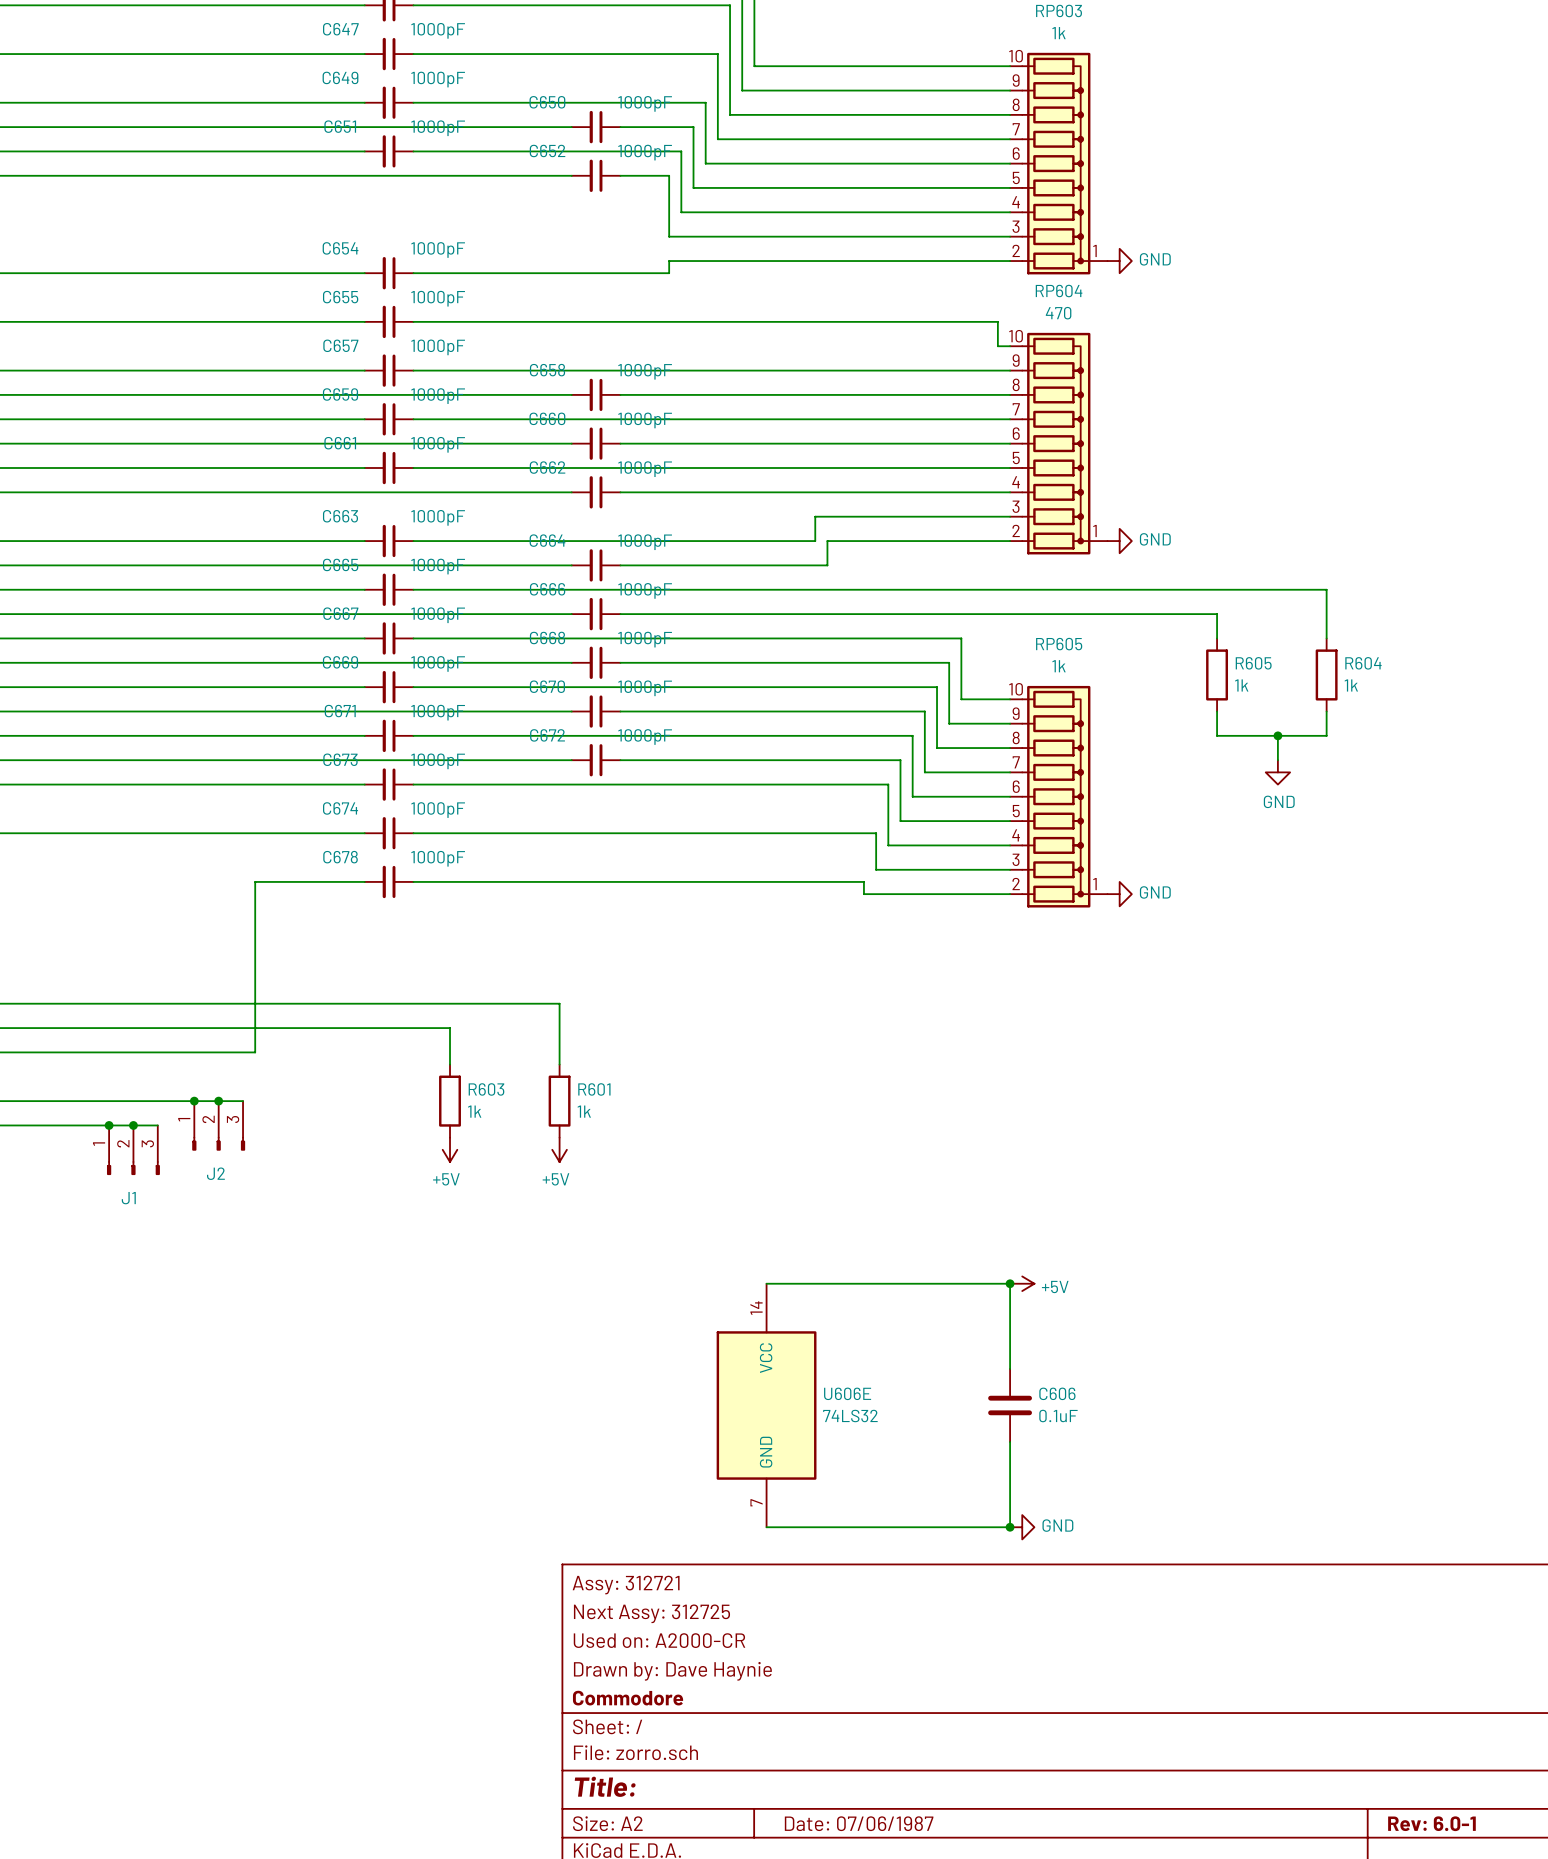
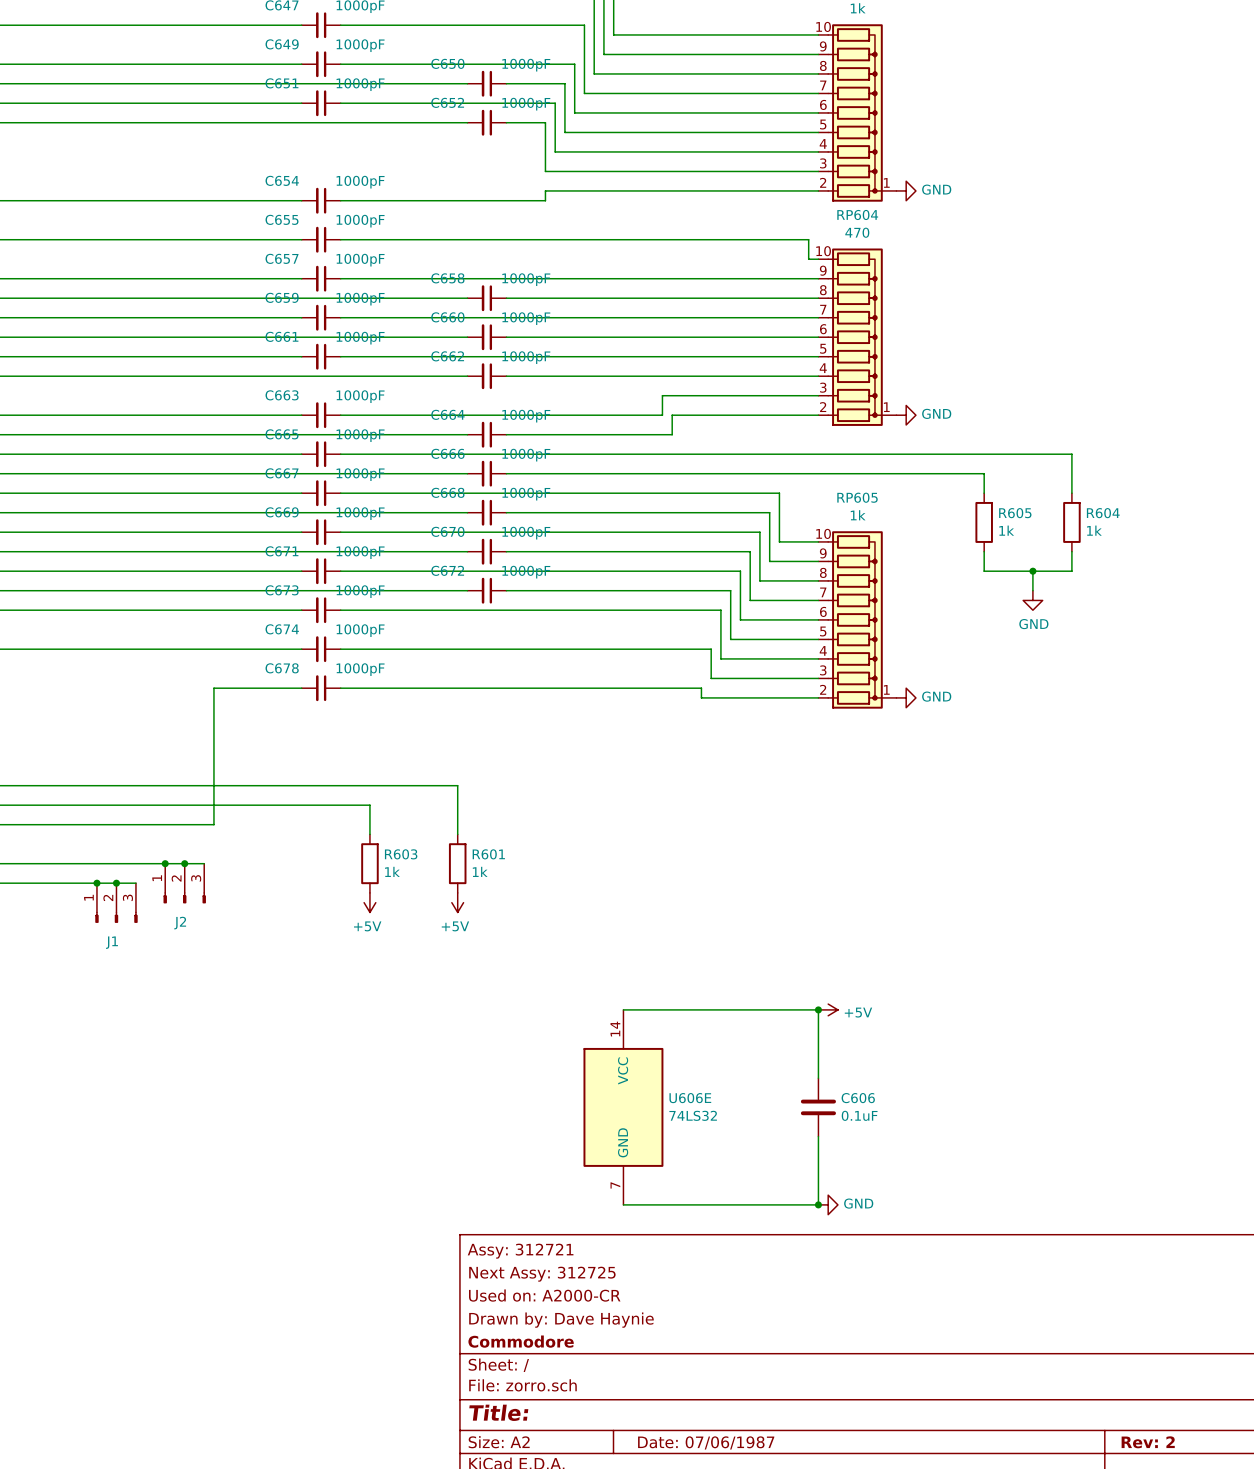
title block: Rev: 6.0-1 (1431, 1823) -> Rev: 2 (1148, 1442)

